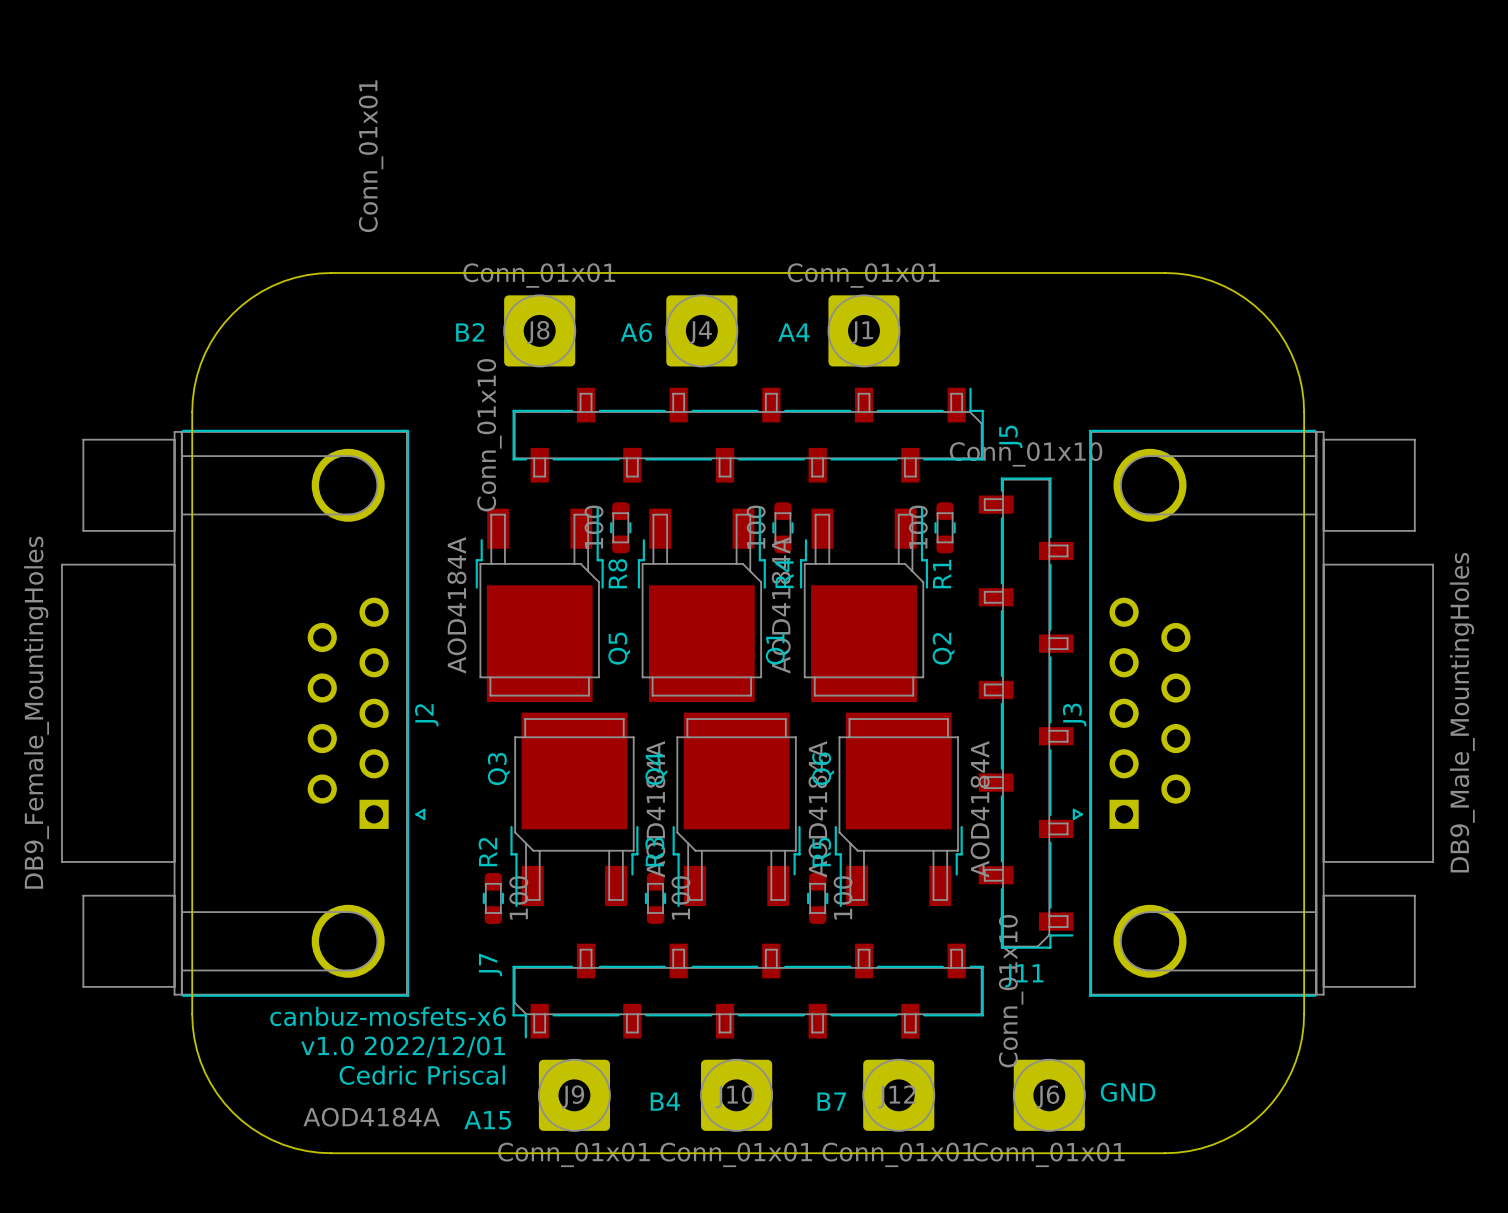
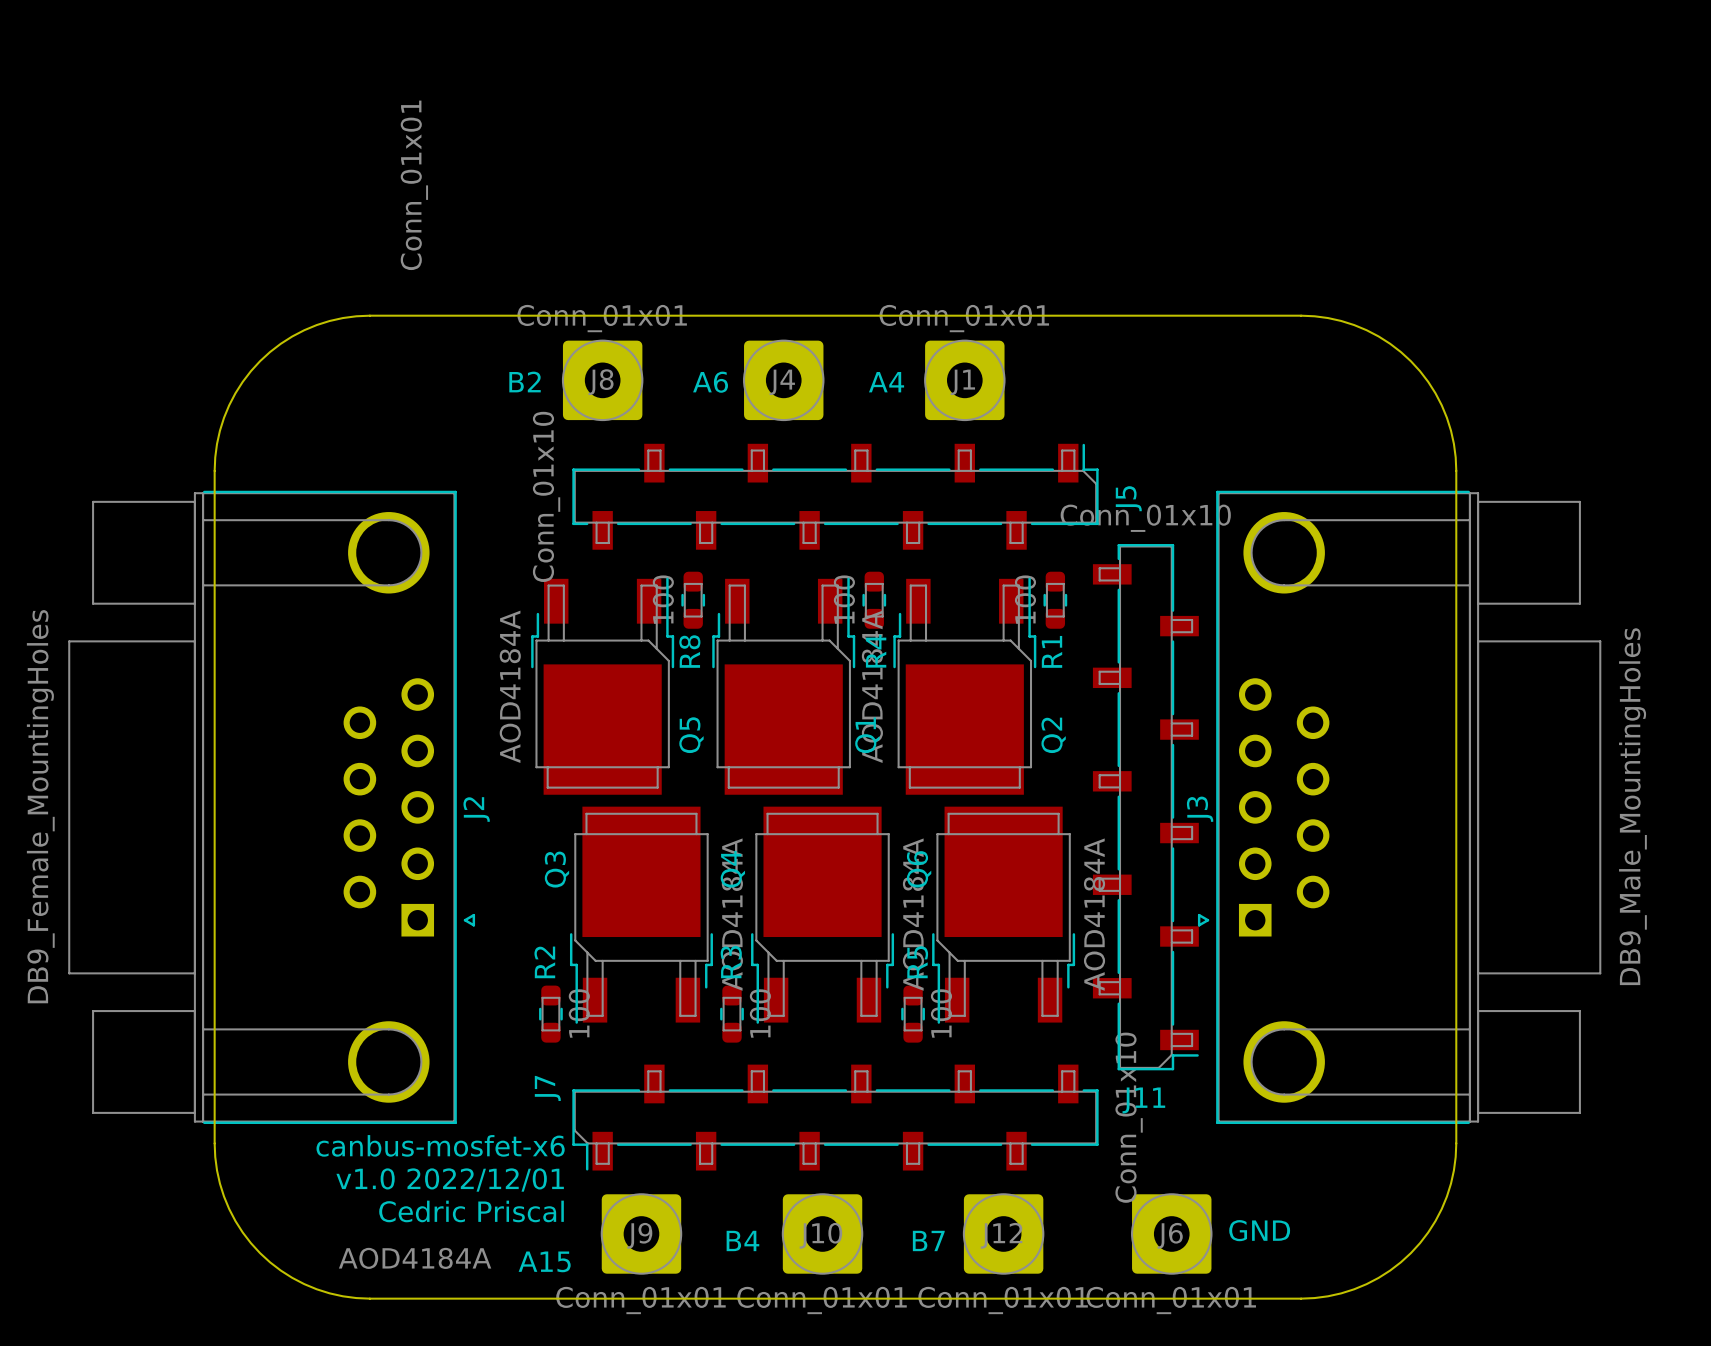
text: canbuz-mosfets-x6 (387, 1016) -> canbus-mosfet-x6 (440, 1145)

